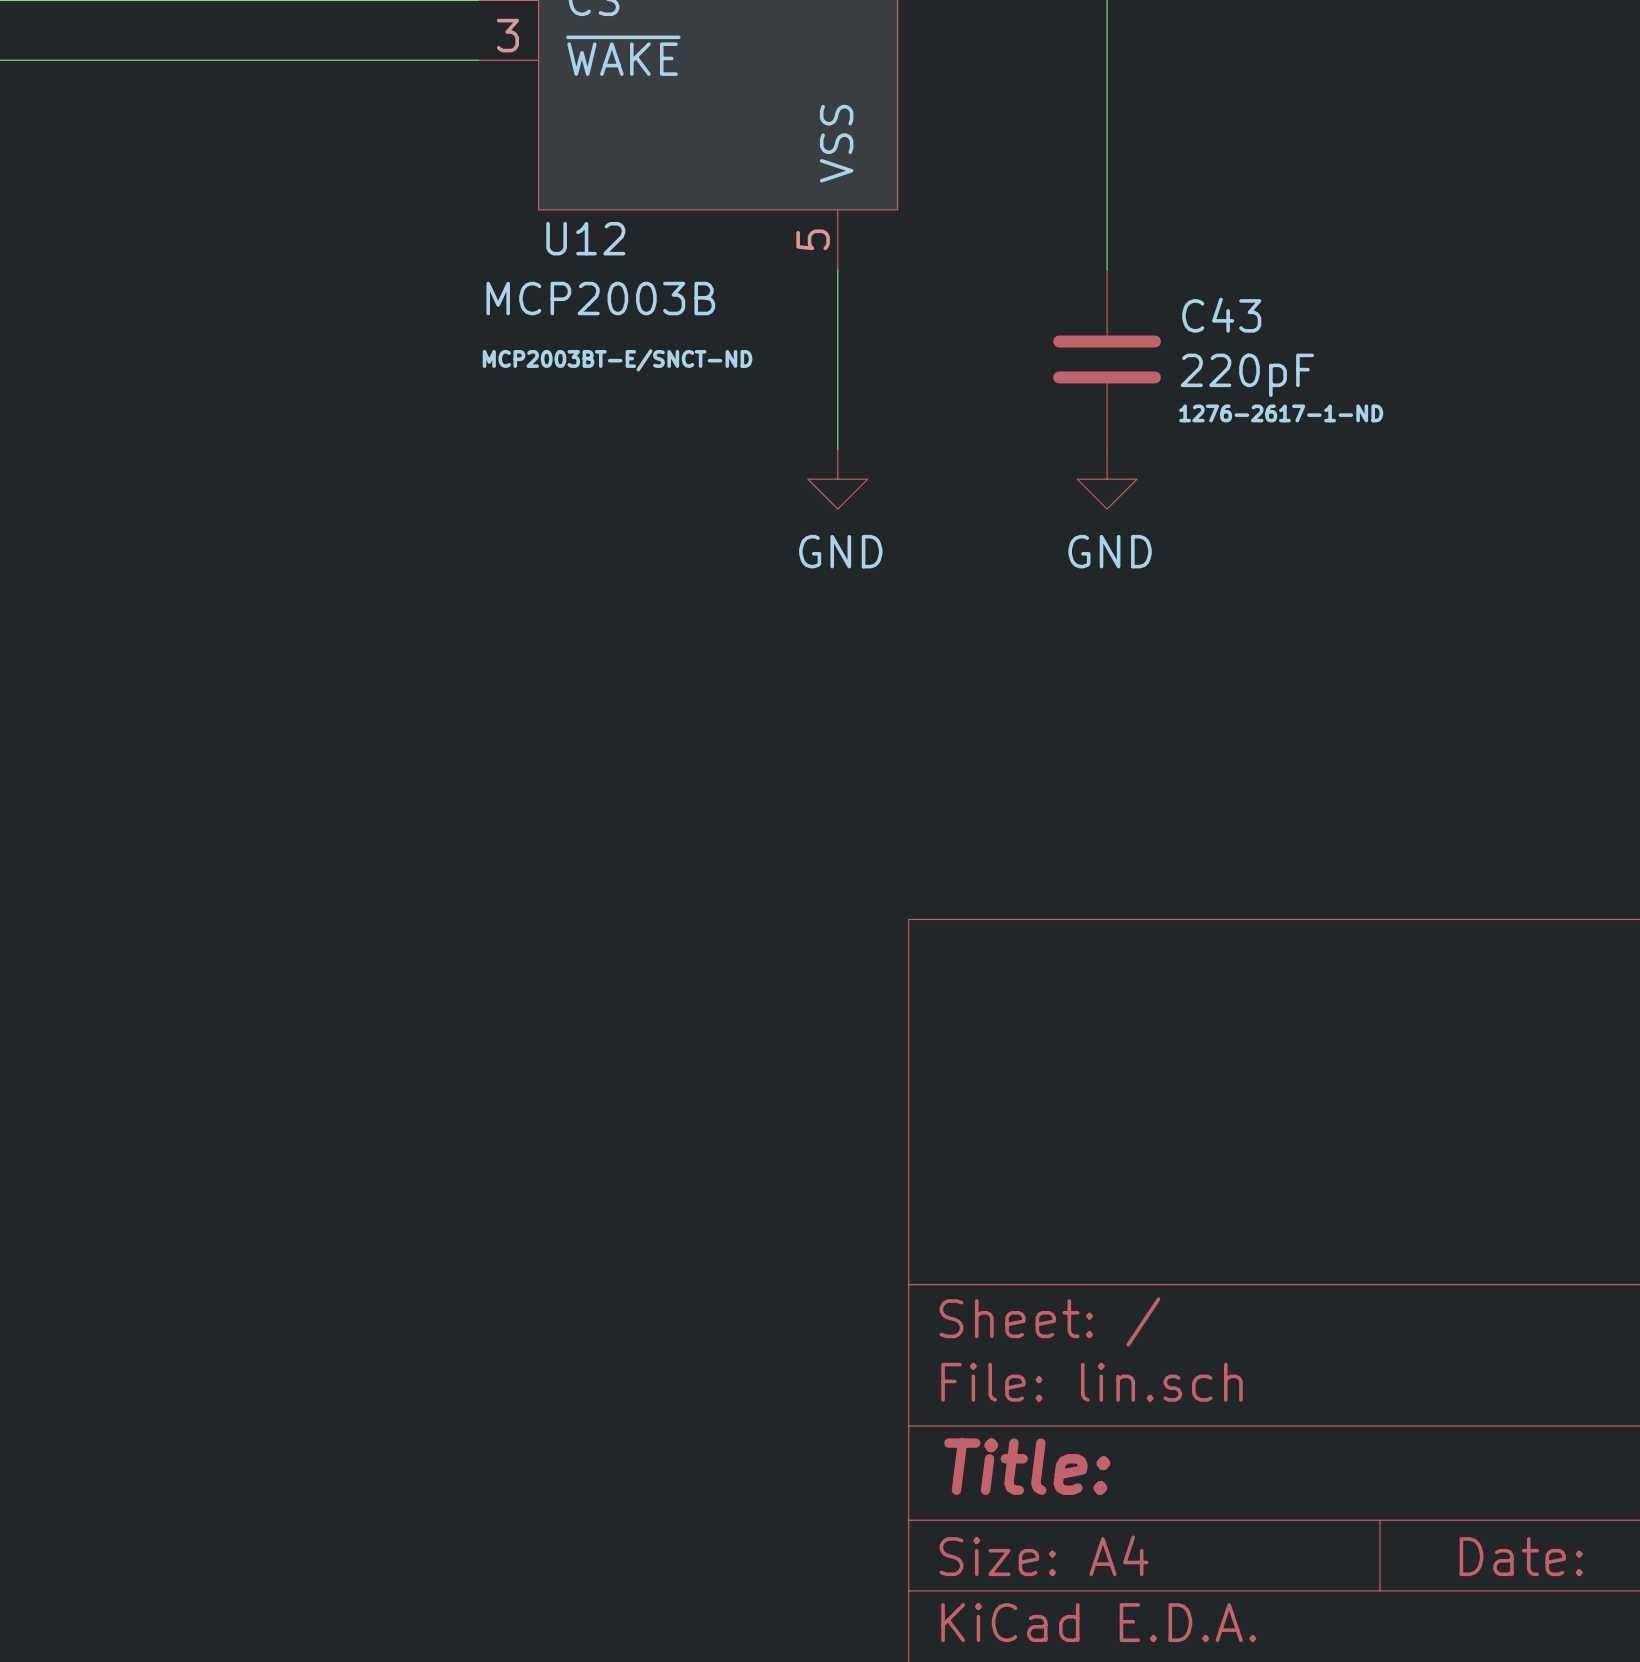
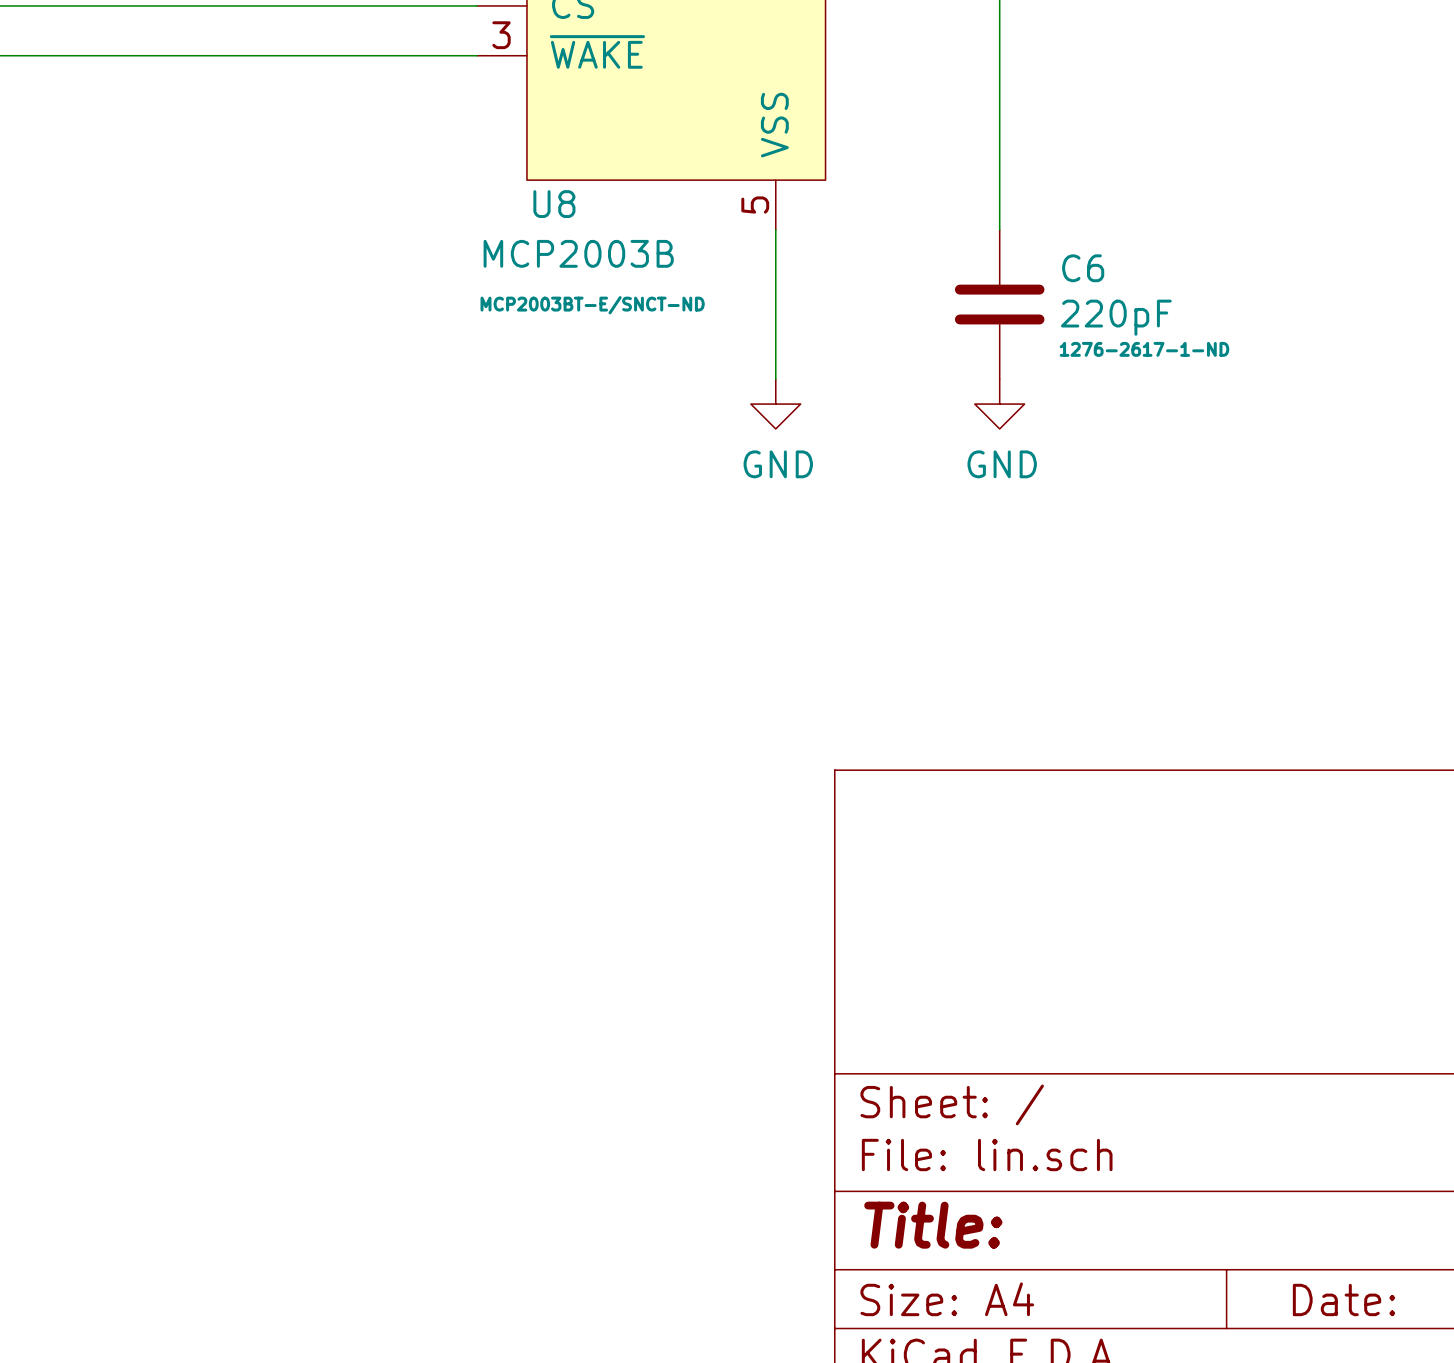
U12 name: U12 (585, 238) -> U8 (554, 204)
C43 name: C43 (1221, 315) -> C6 (1083, 268)

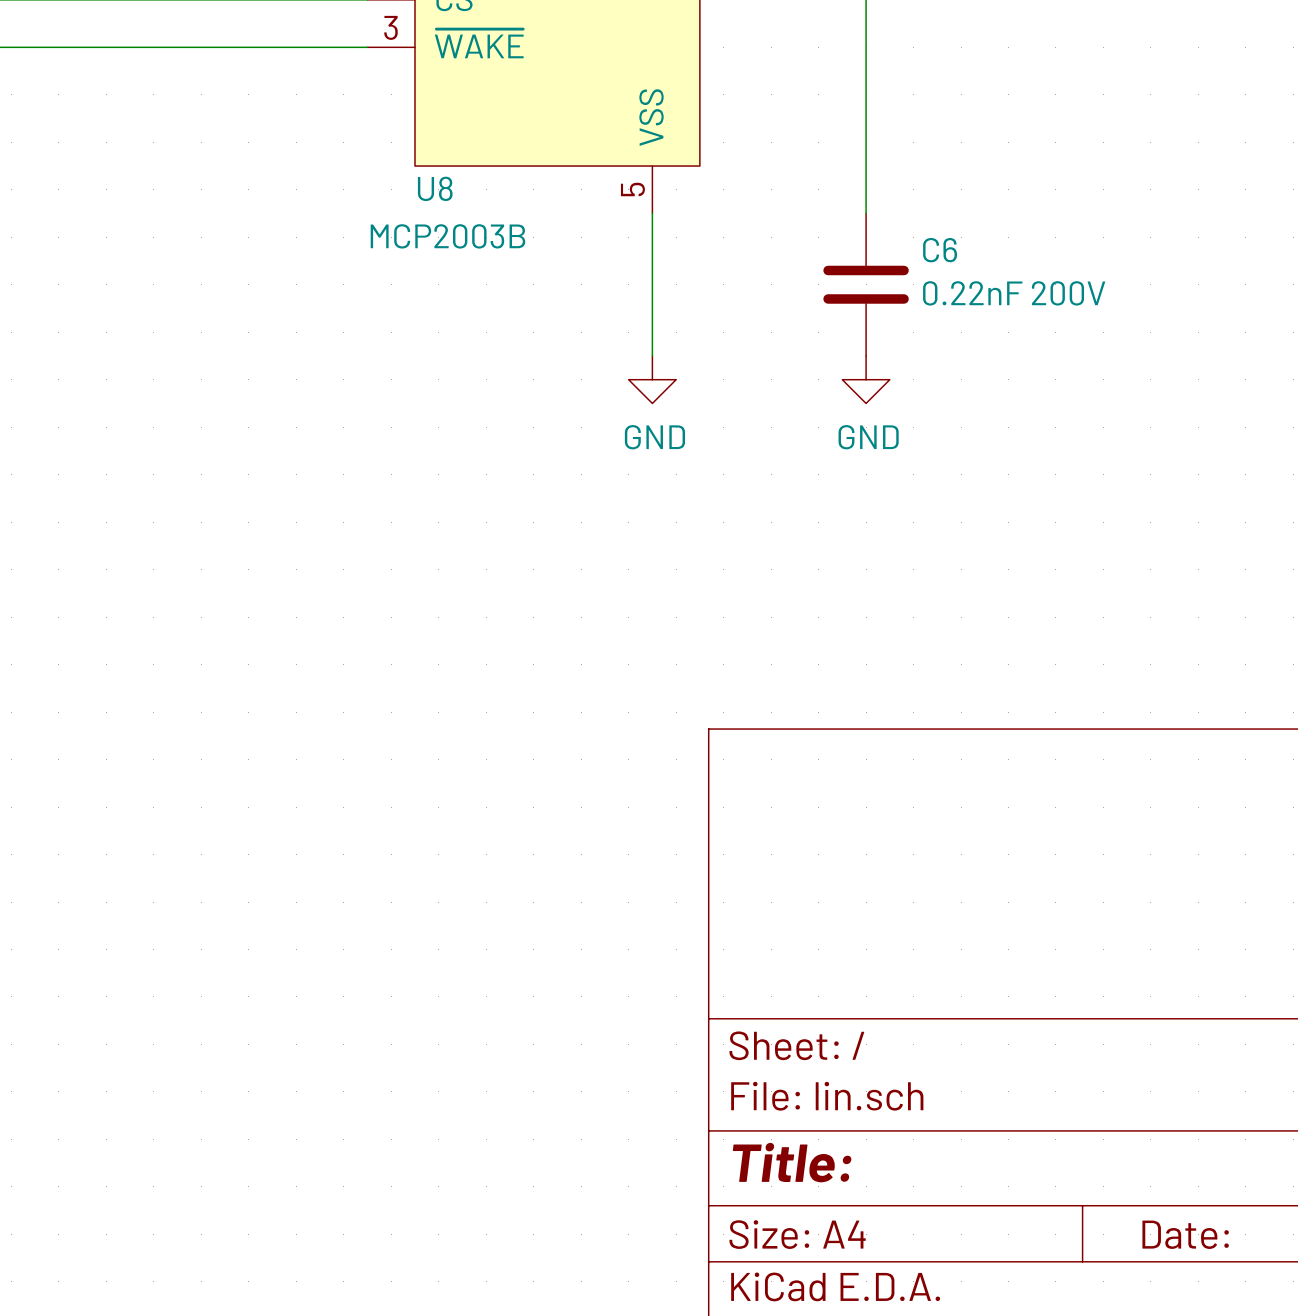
U8 text: MCP2003BT-E/SNCT-ND (592, 305) -> none
C6 value: 220pF (1116, 317) -> 0.22nF 200V (1014, 293)
C6 text: 1276-2617-1-ND (1144, 349) -> none

